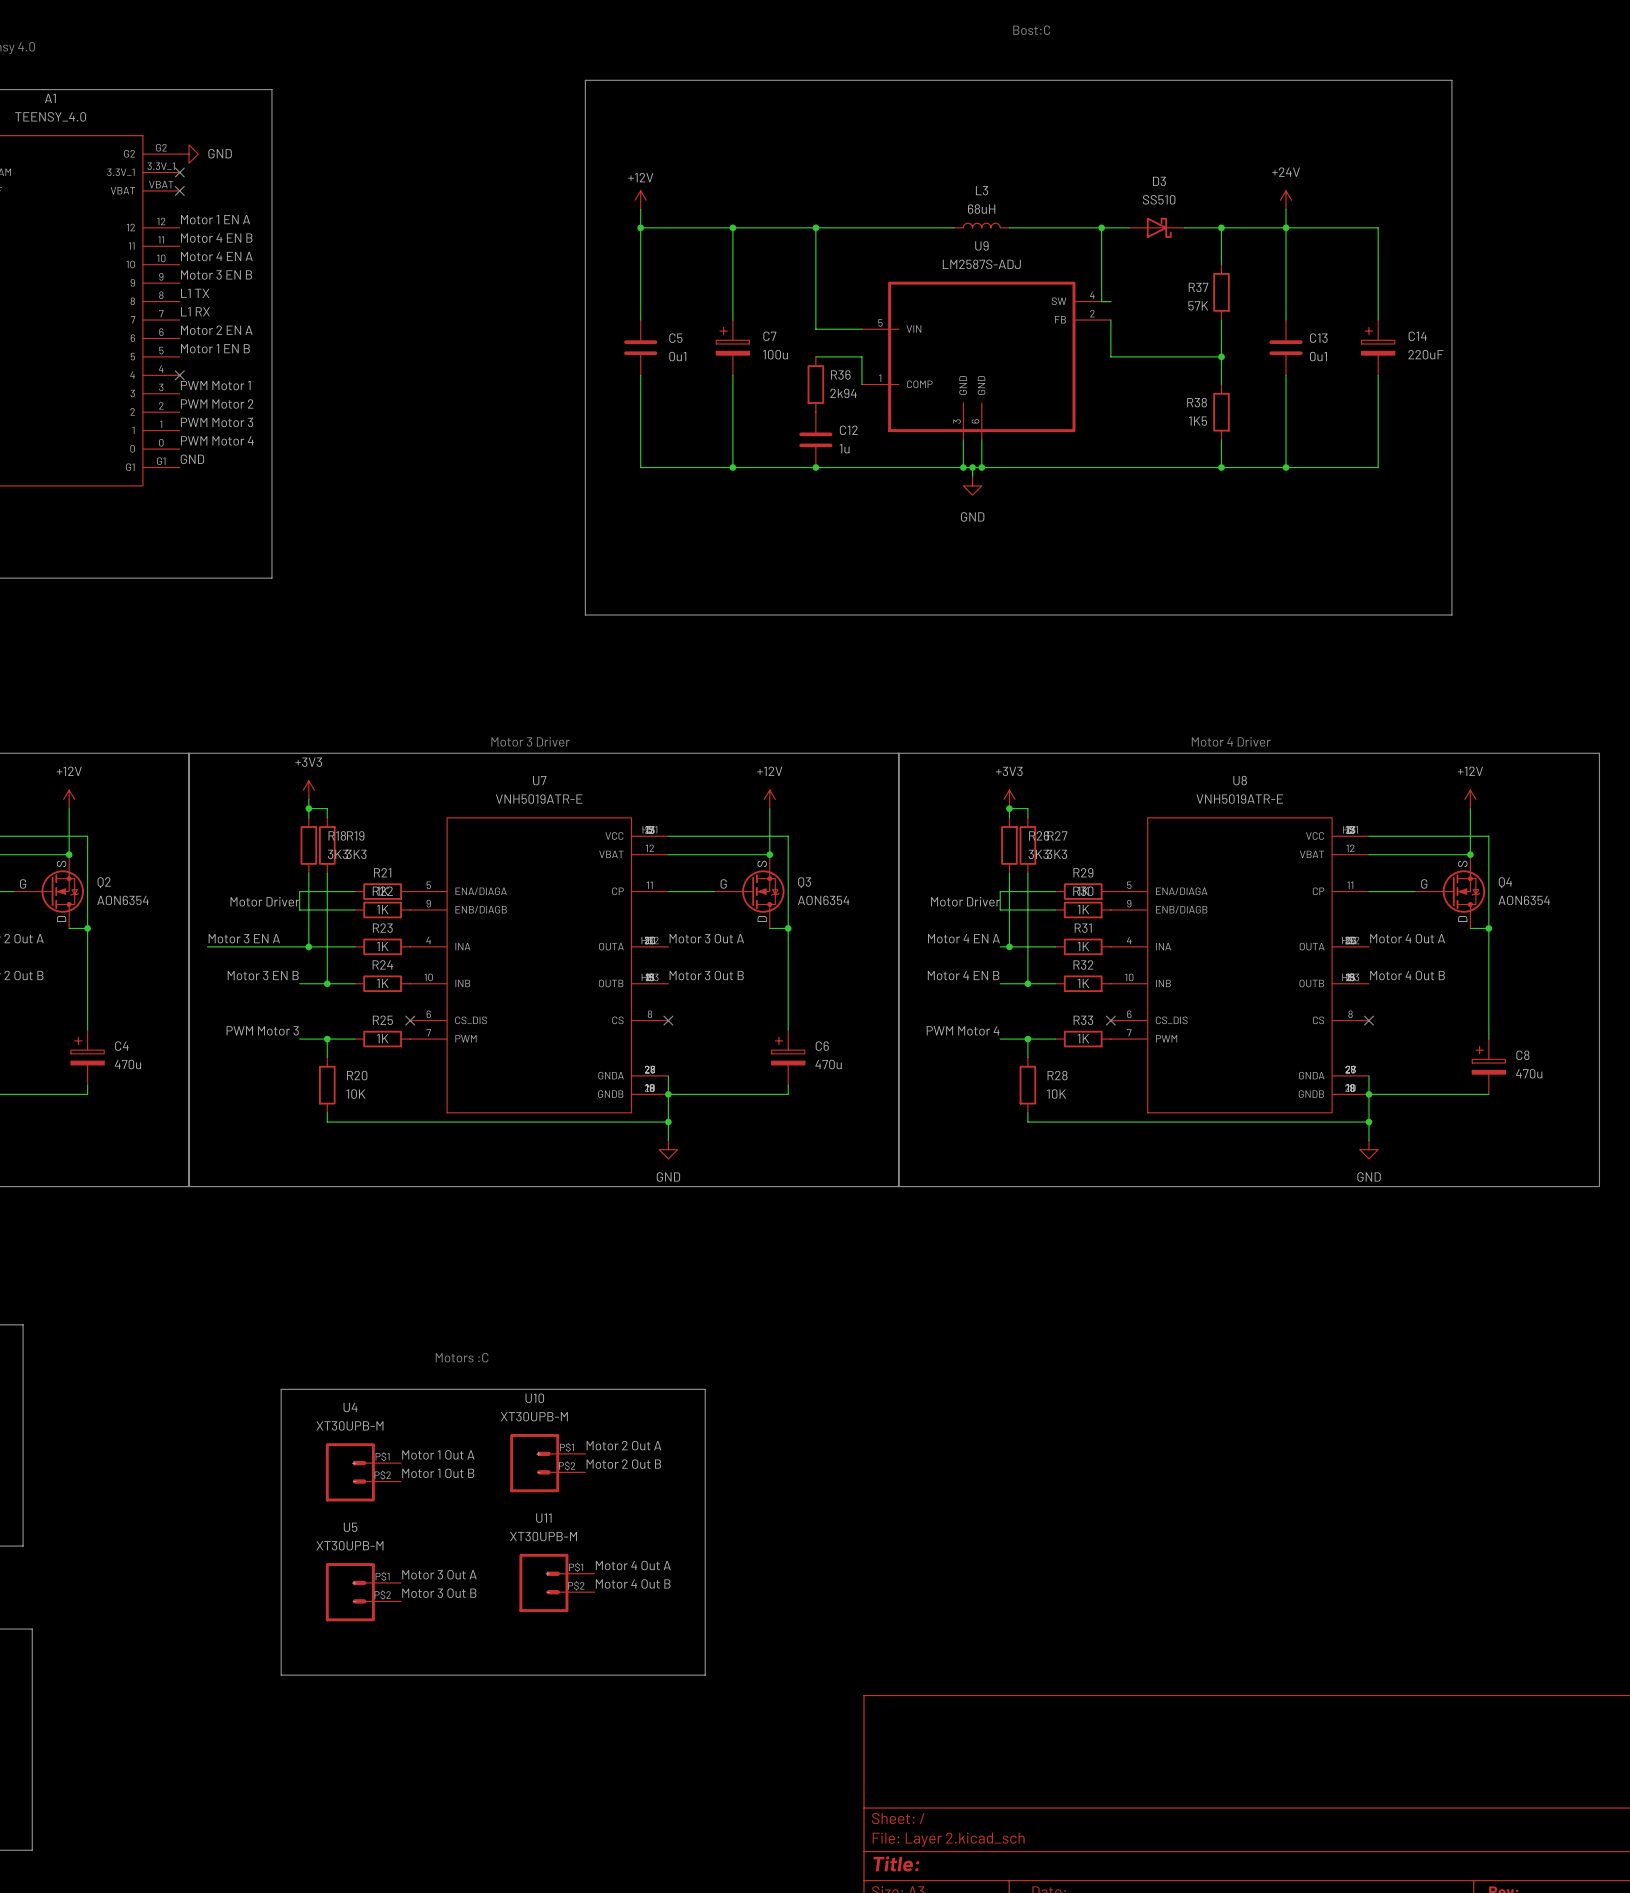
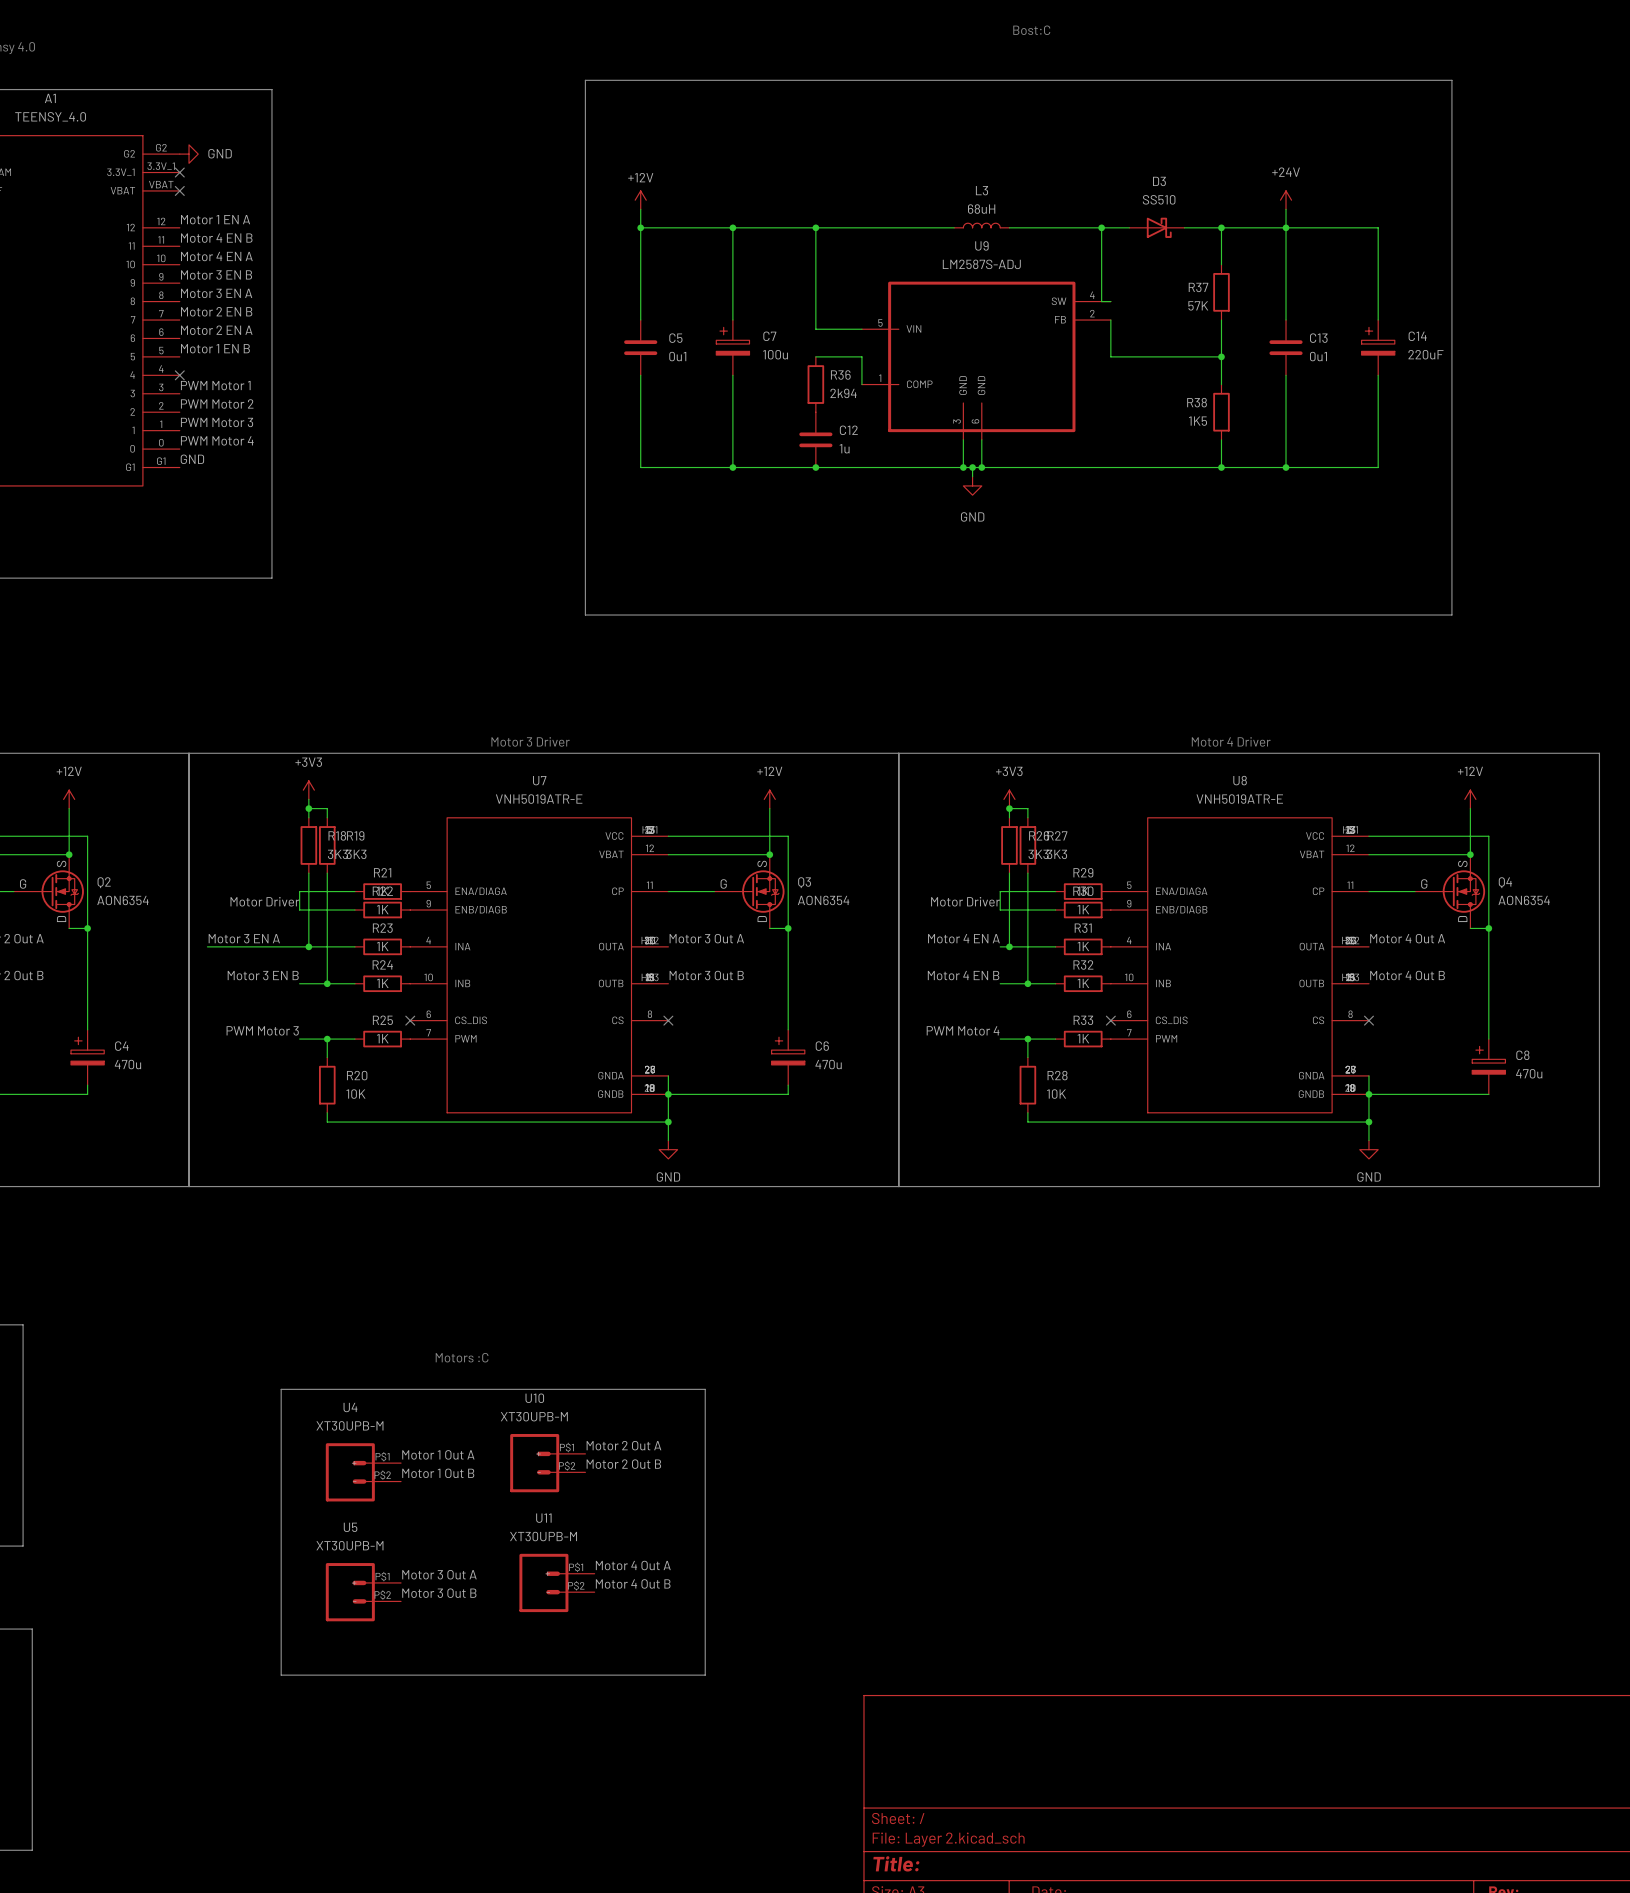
label: L1 TX (195, 293) -> Motor 3 EN A (216, 293)
label: L1 RX (195, 311) -> Motor 2 EN B (216, 311)

